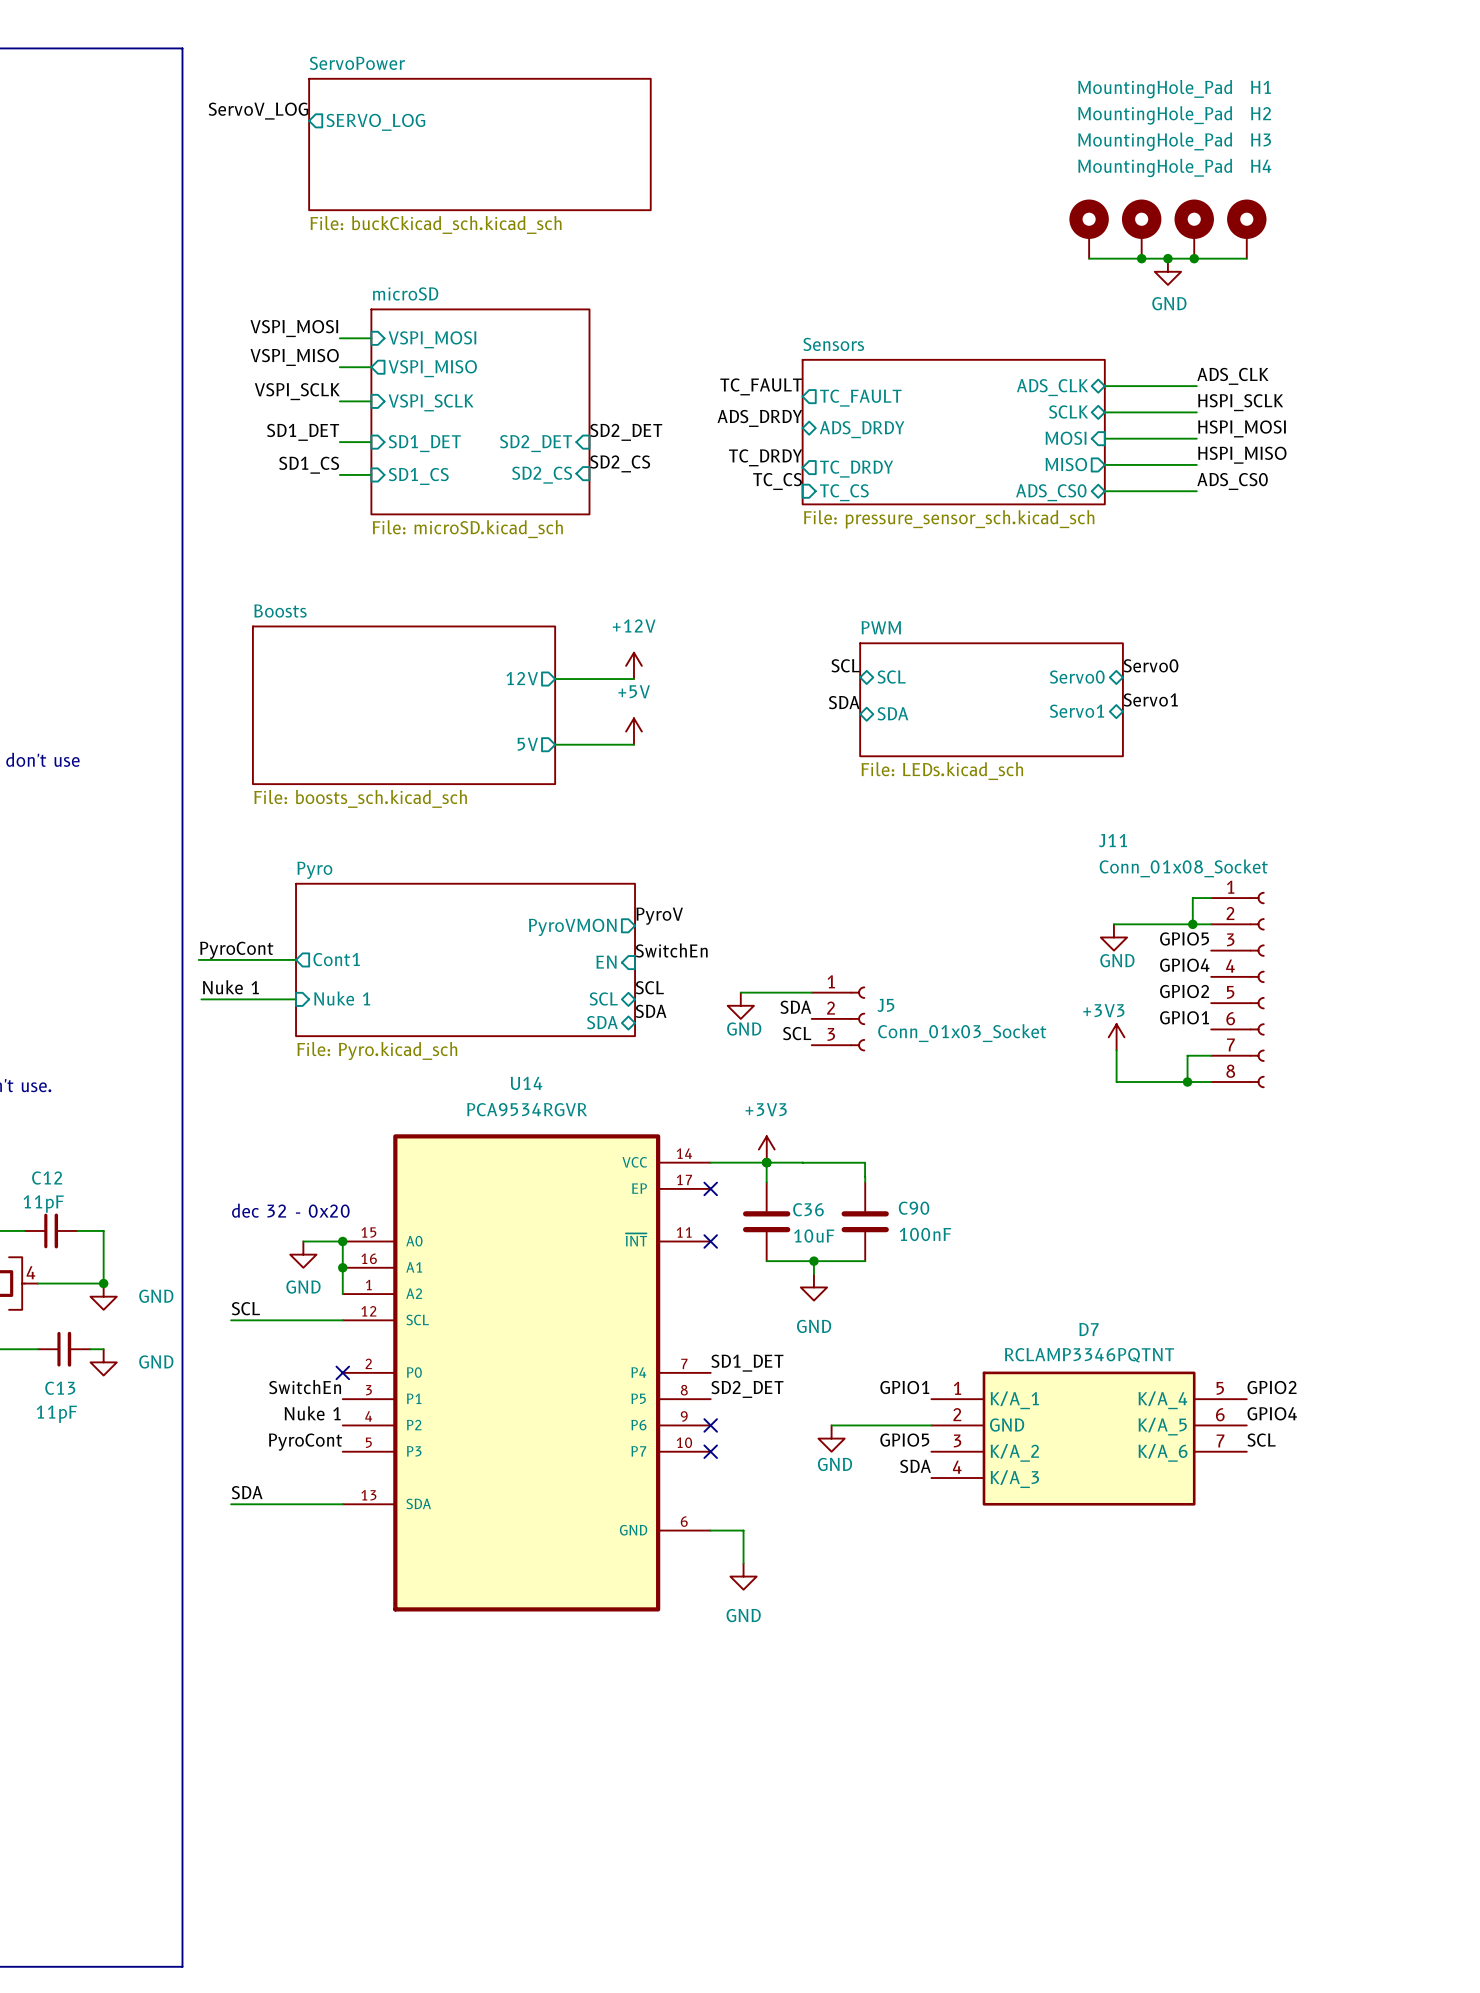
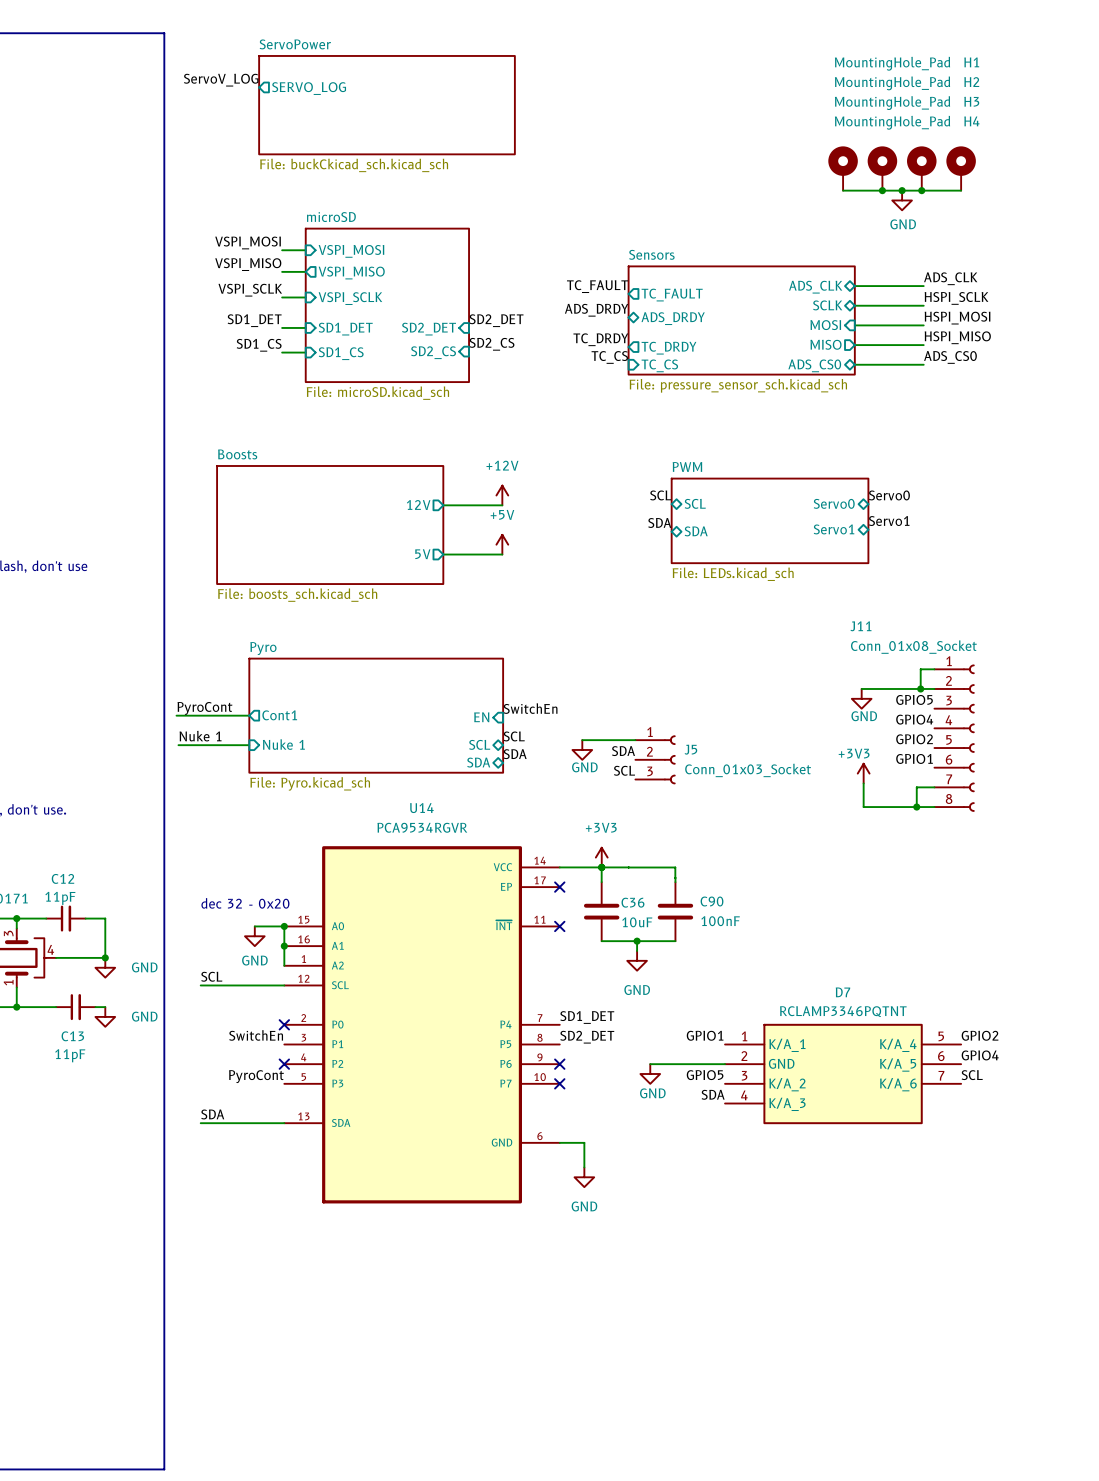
label: PyroV (659, 916) -> none
sheet pin: PyroVMON (572, 927) -> none
label: Nuke 1 (312, 1413) -> none
no-connect mark: none -> (284, 1064)

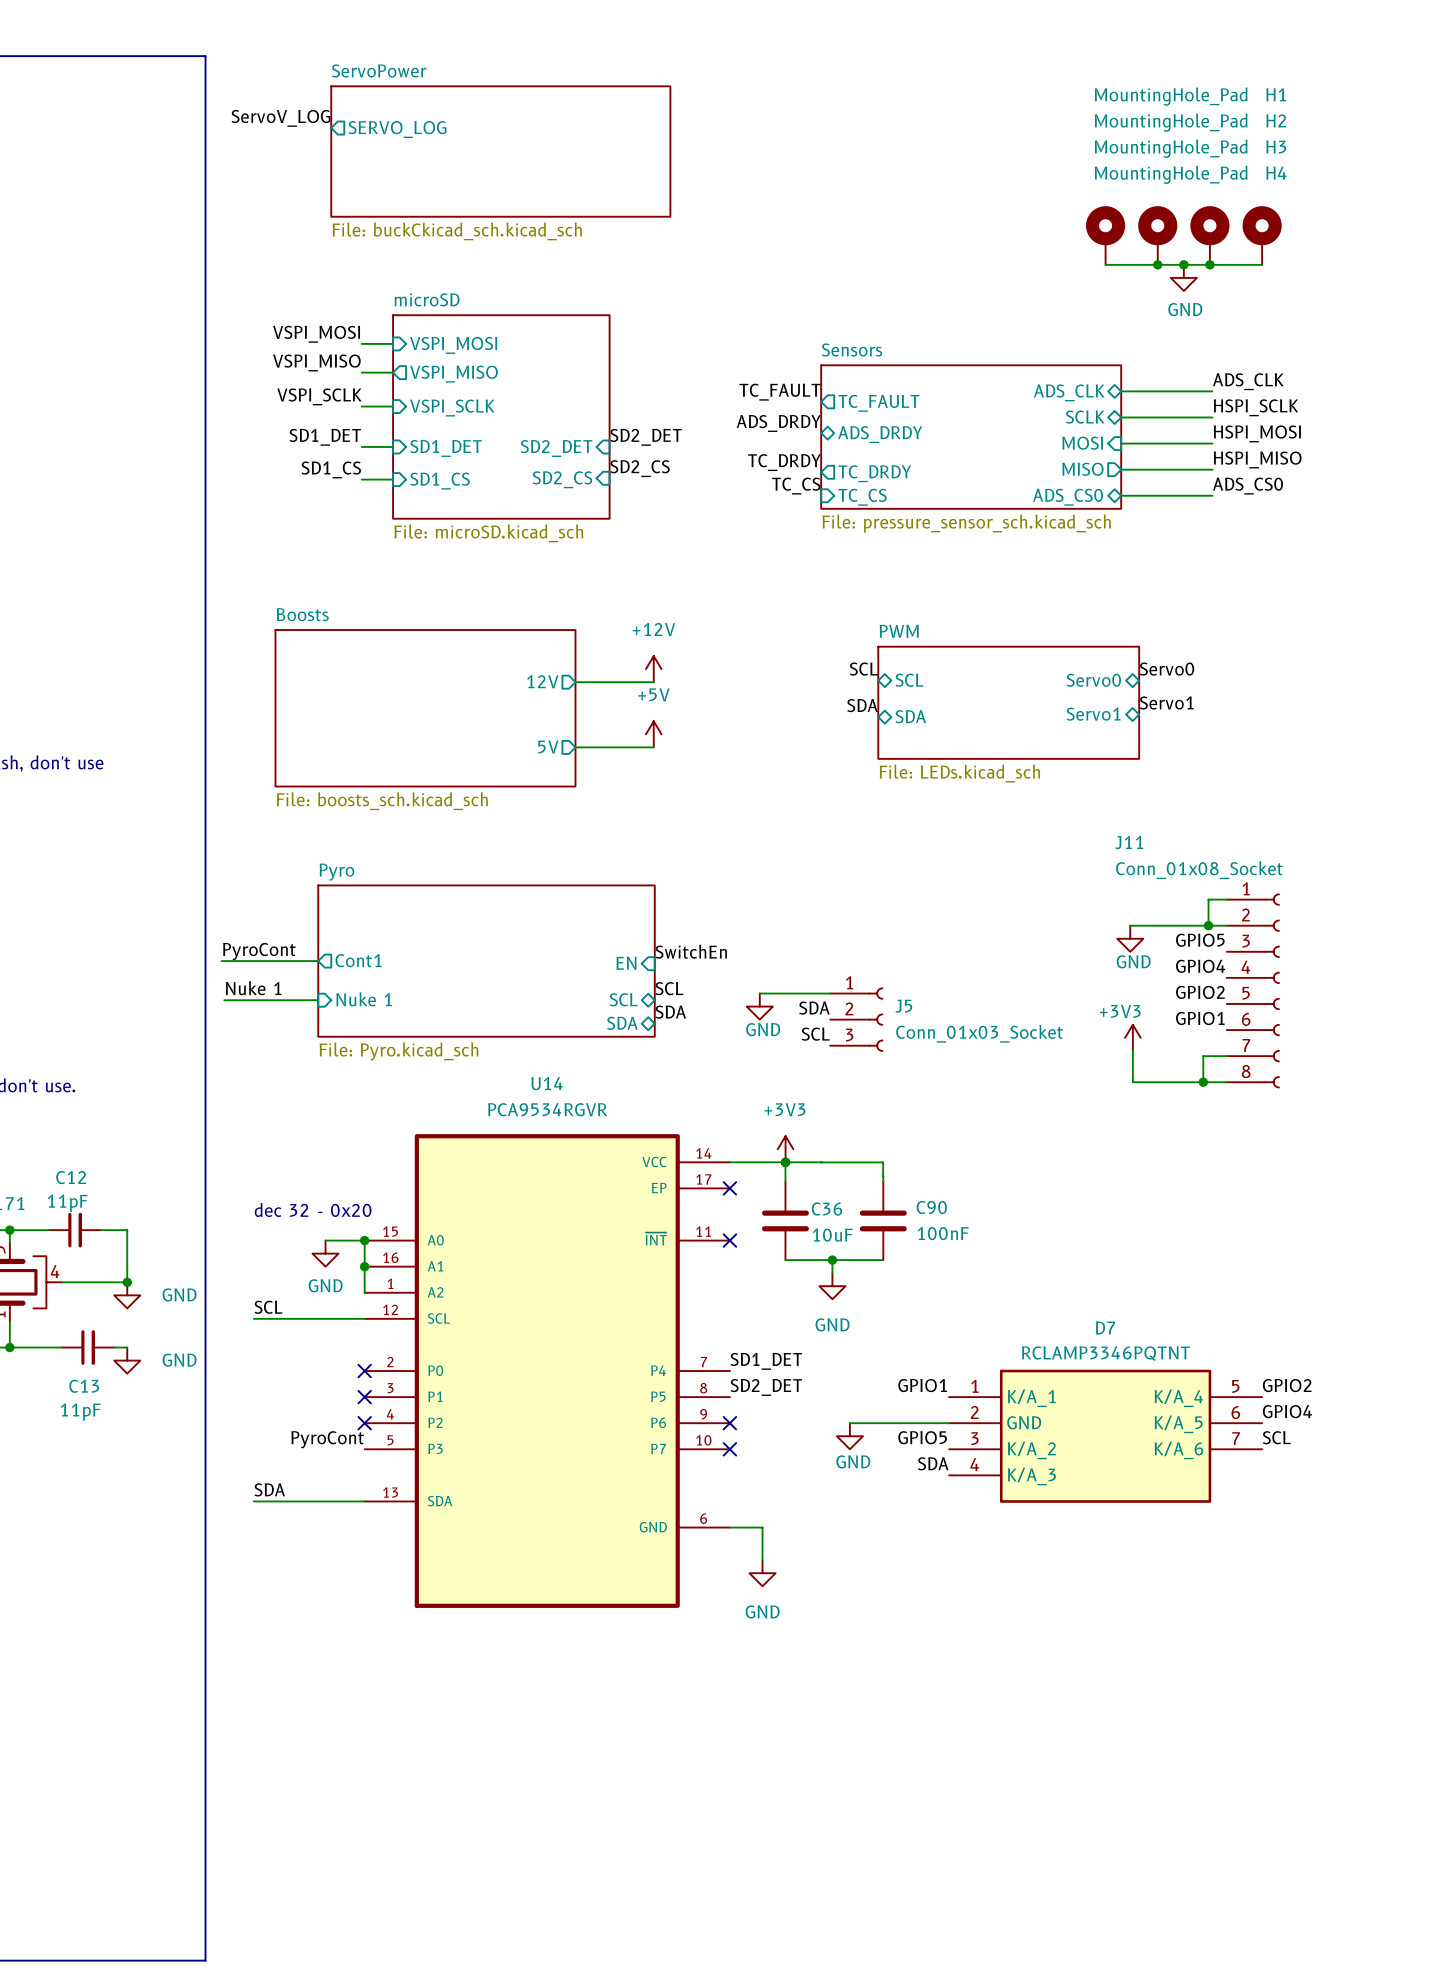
label: SwitchEn (256, 1035) -> none
no-connect mark: none -> (364, 1397)

